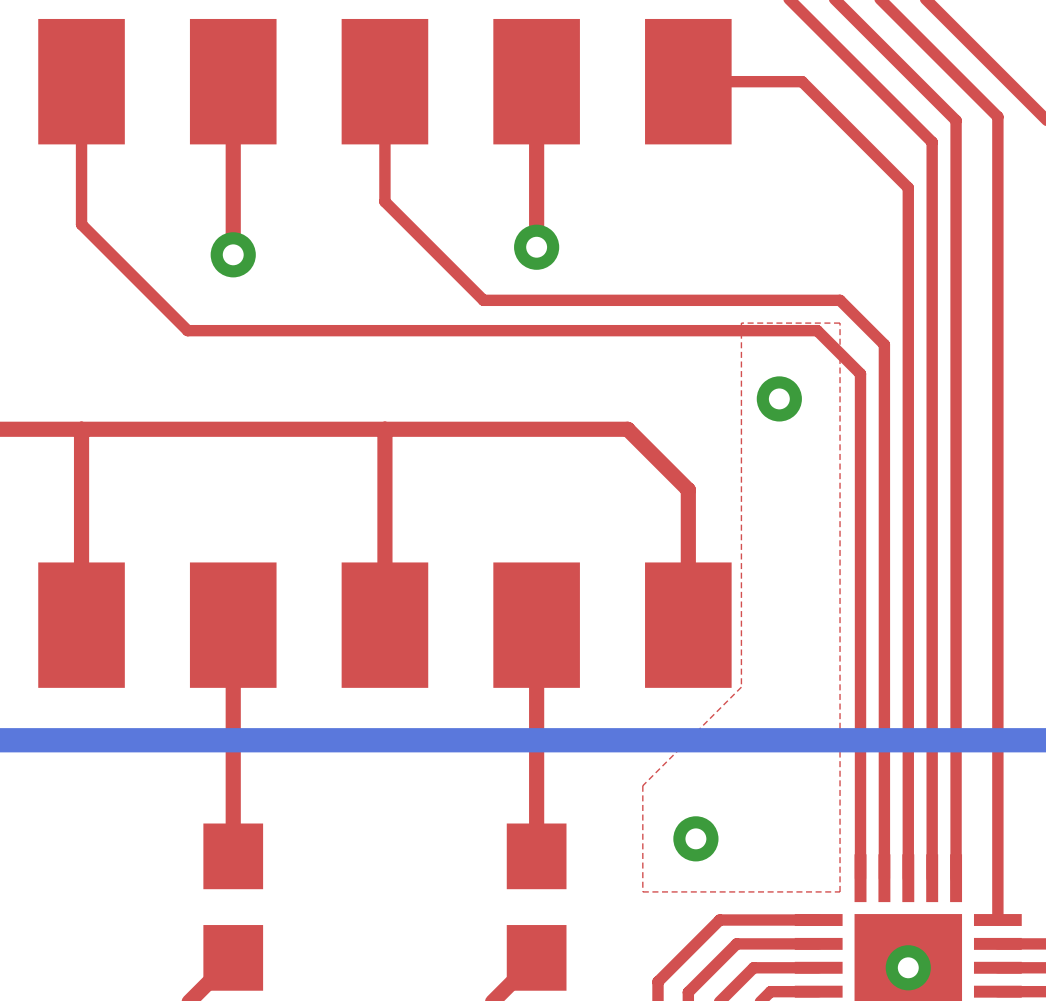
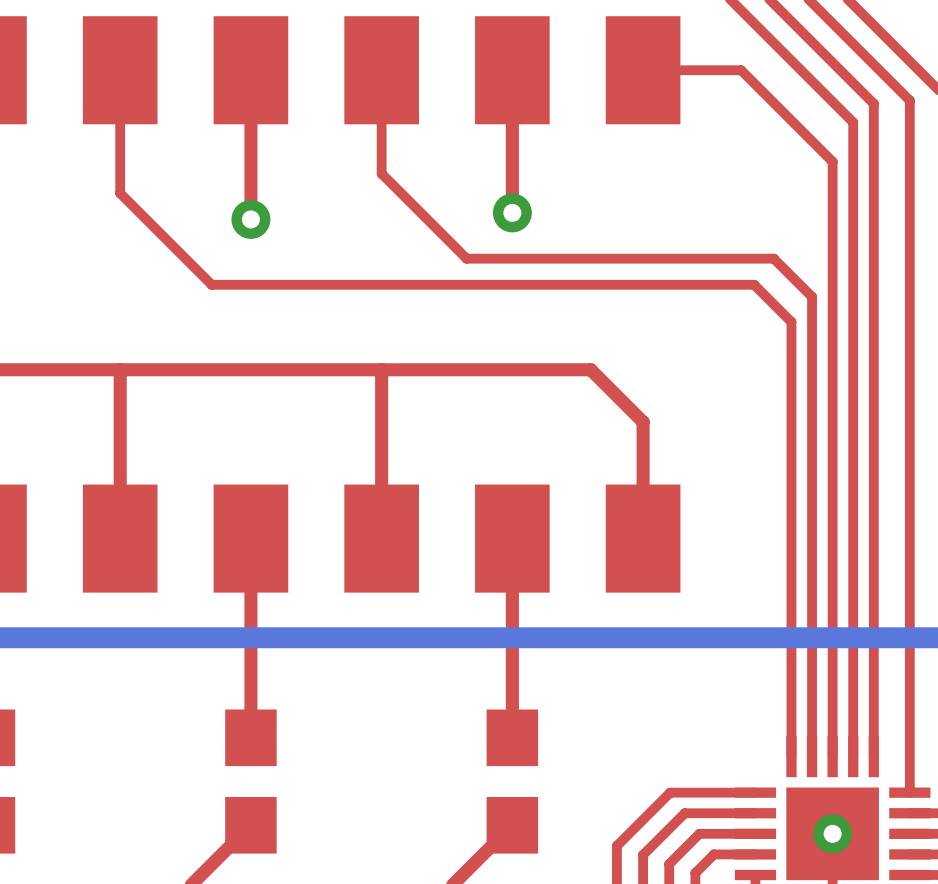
top zone outline: (840, 323) (840, 891) (642, 891) (642, 785) (741, 687) (741, 323) (840, 323) -> none
via: (779, 398) -> none
via: (695, 838) -> none

